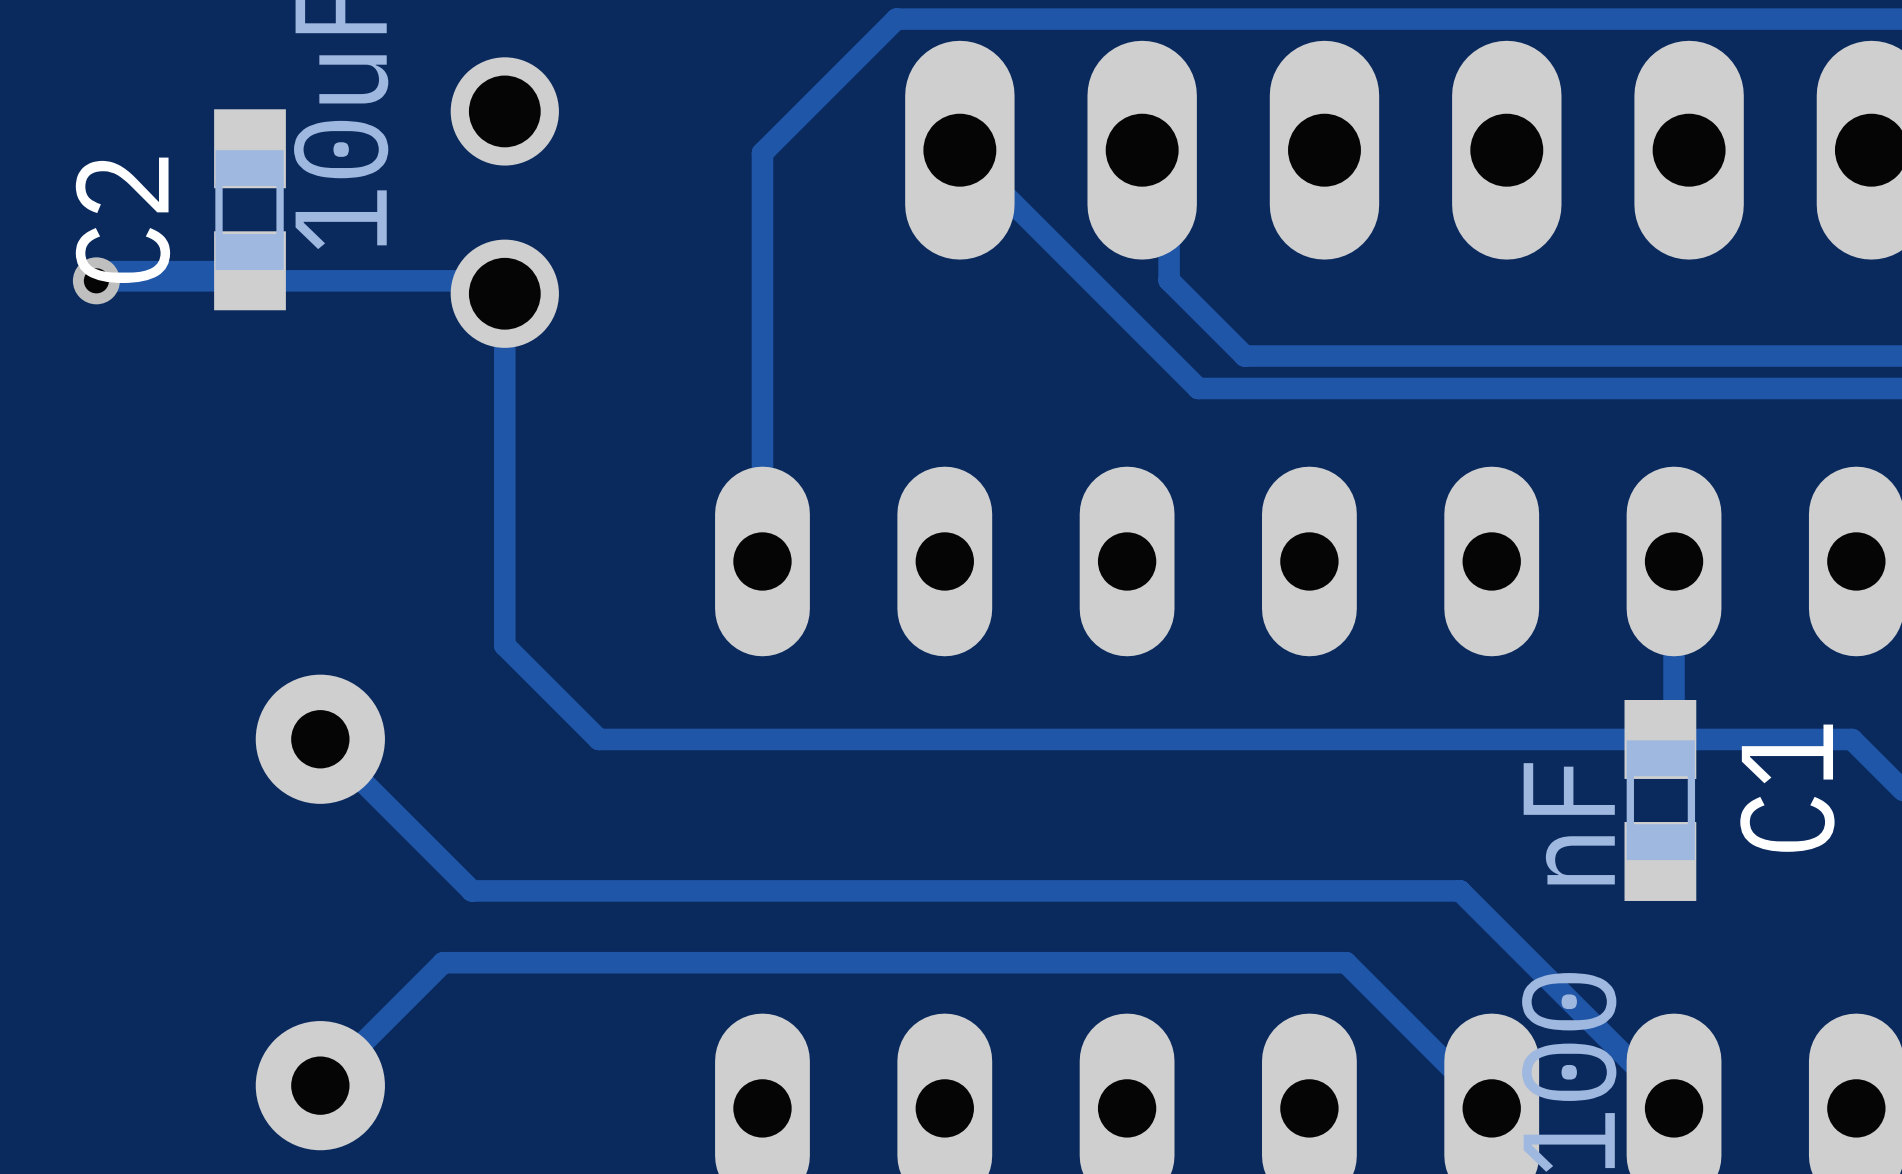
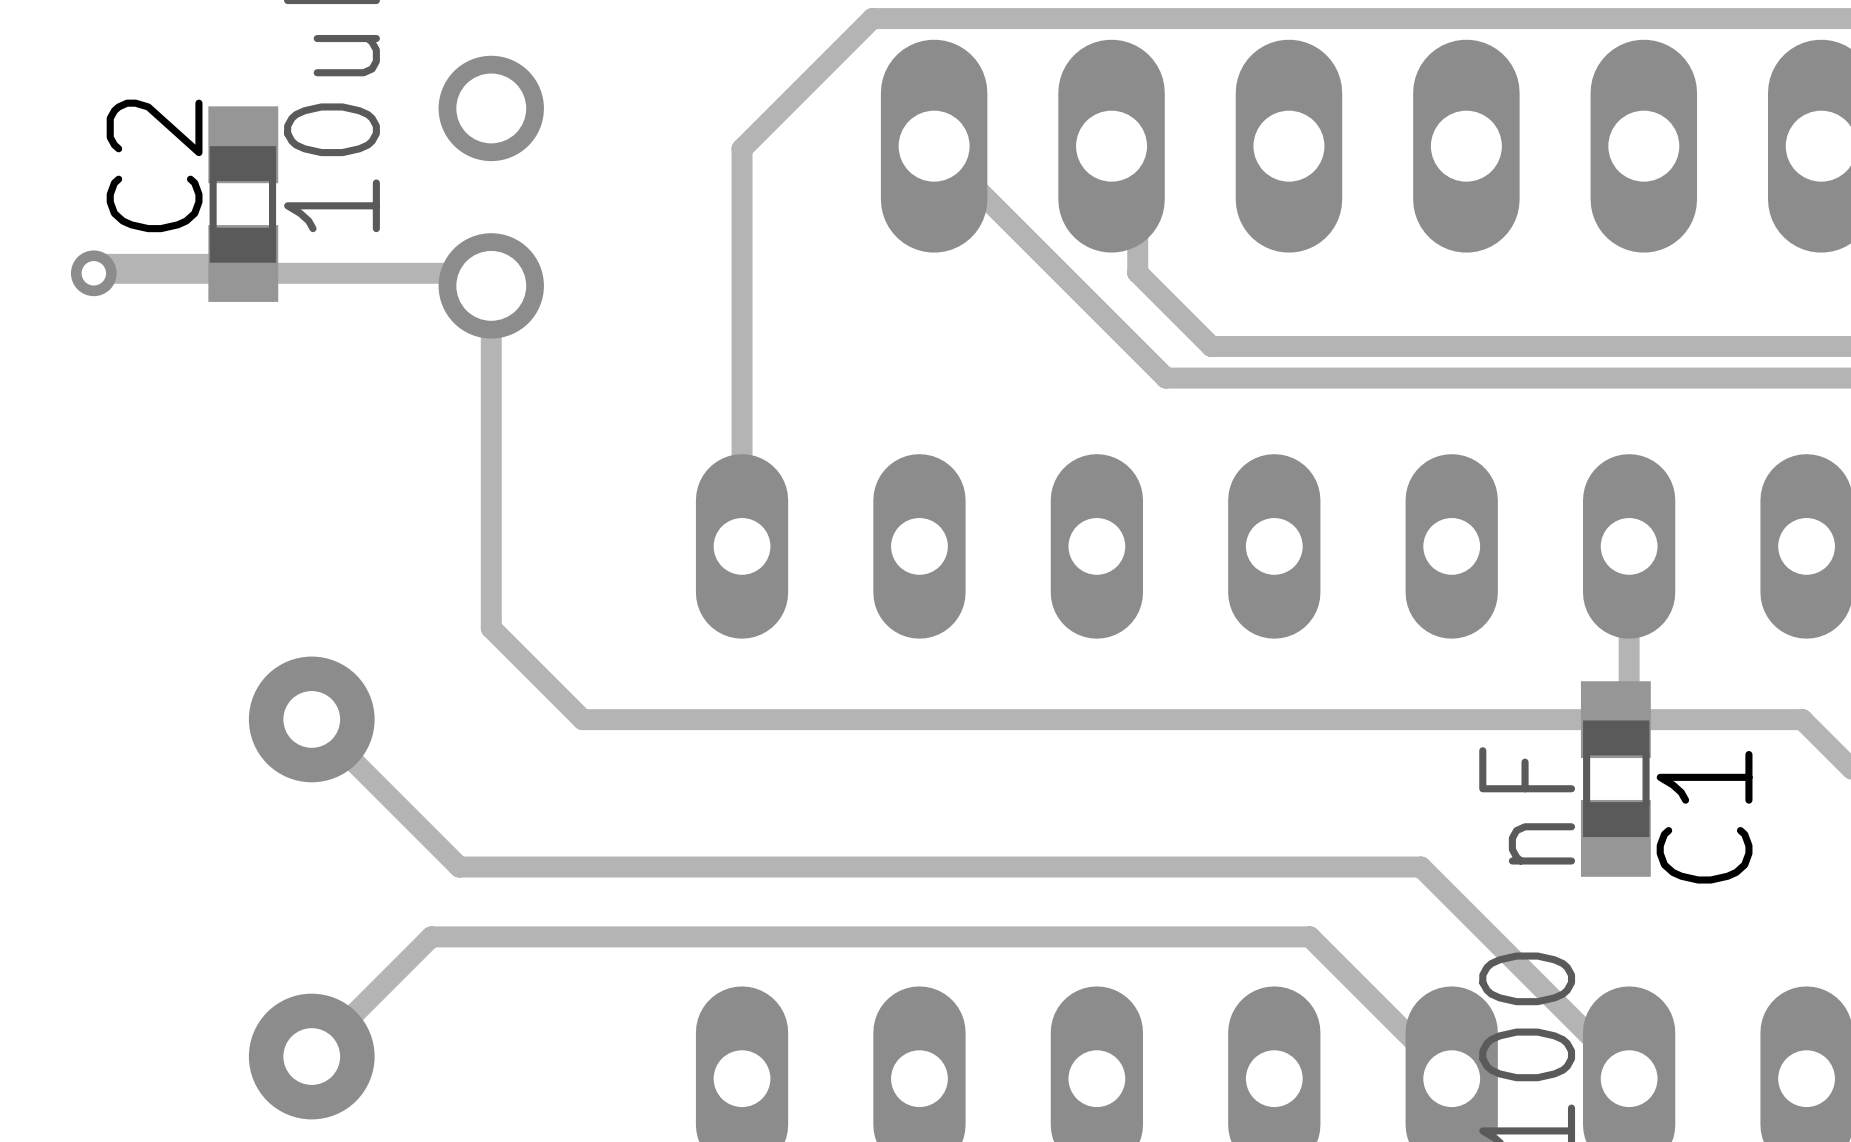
C2 name position: C2 (122, 220) -> C2 (154, 165)
C1 name position: C1 (1787, 788) -> C1 (1704, 817)

